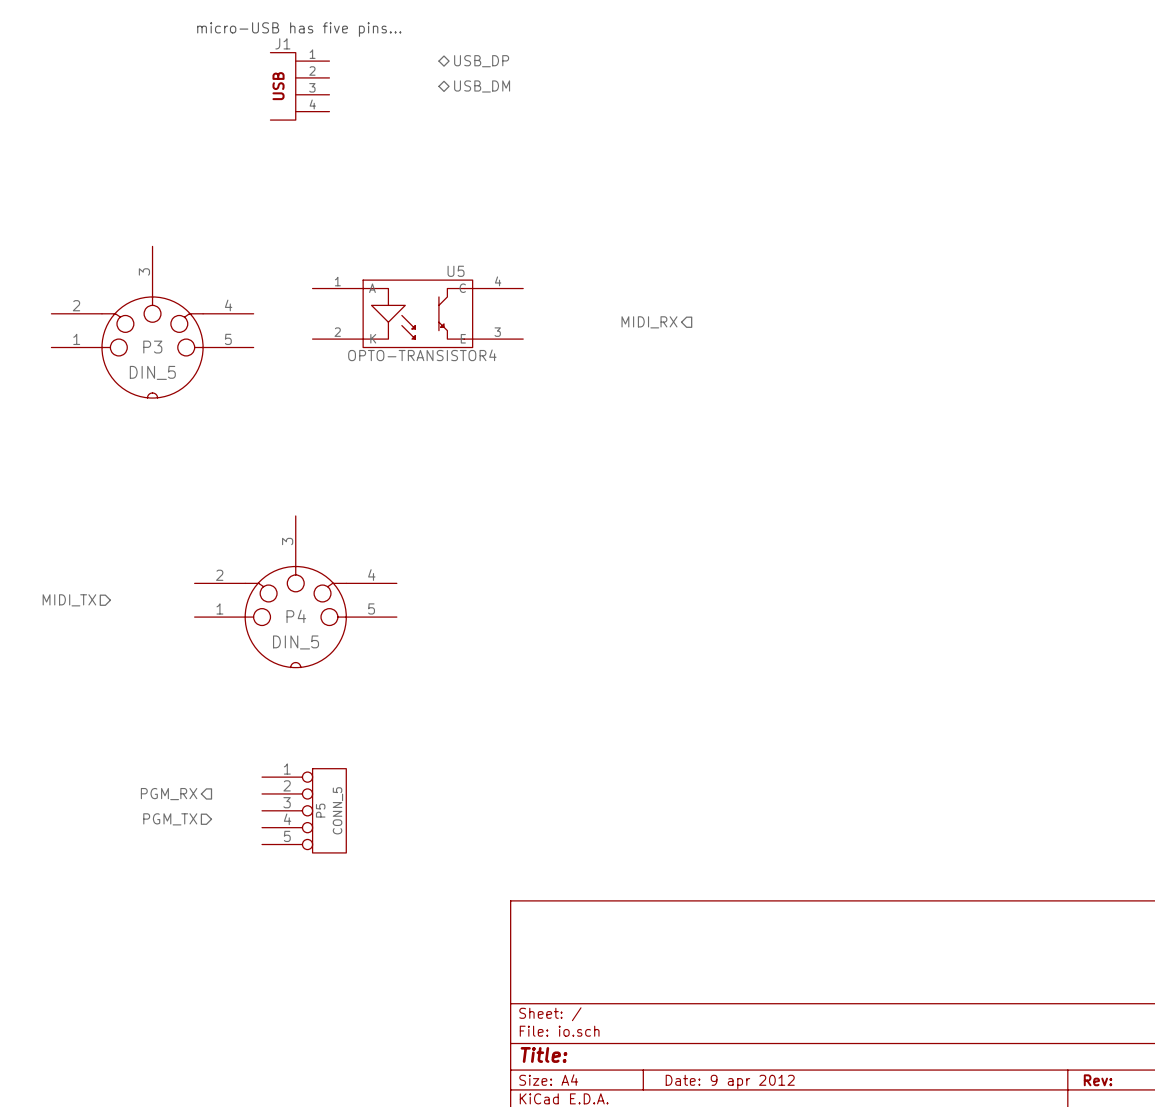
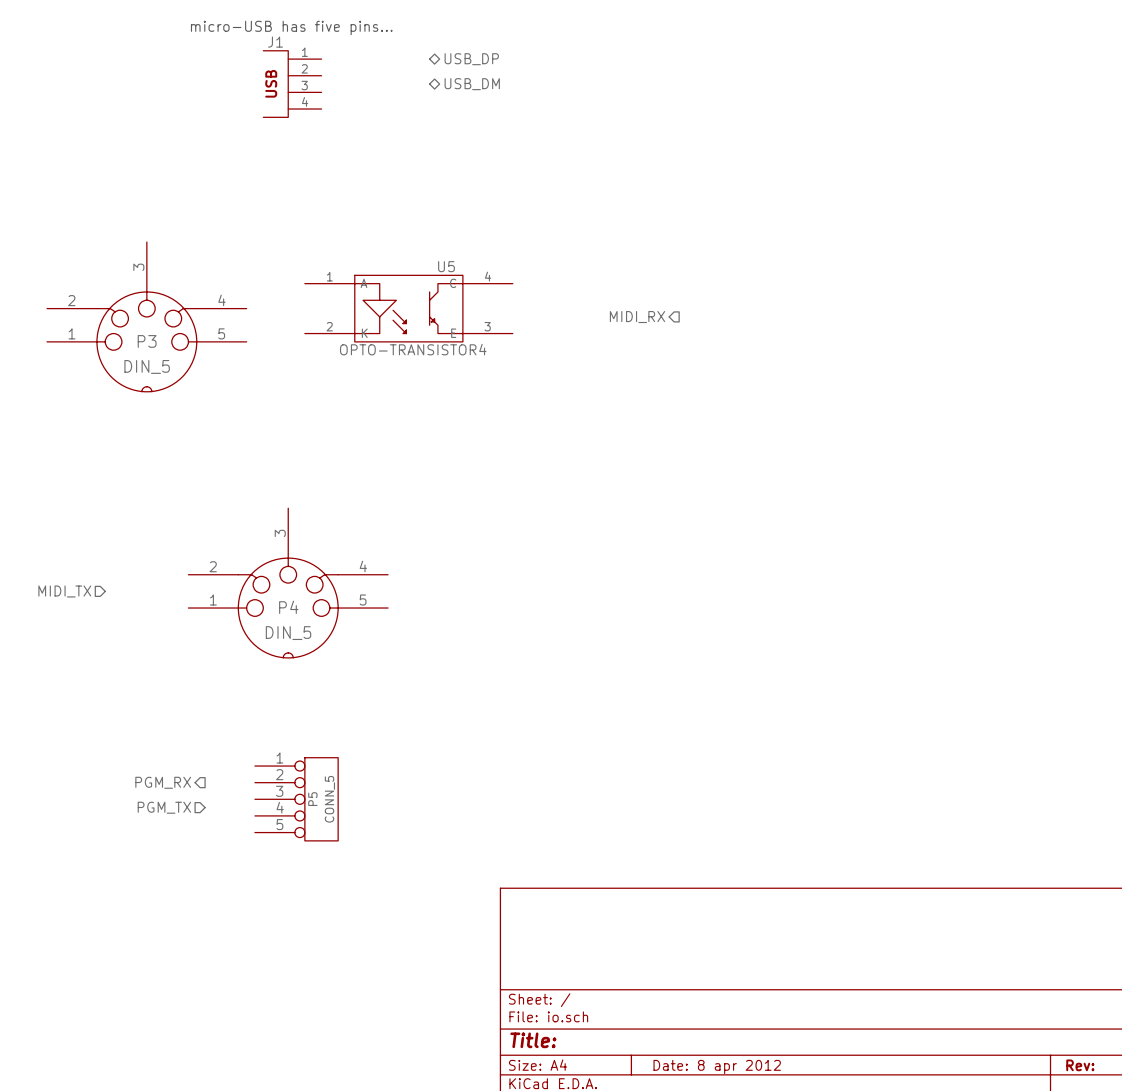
title block: Date: 9 apr 2012 (730, 1081) -> Date: 8 apr 2012 (717, 1066)

